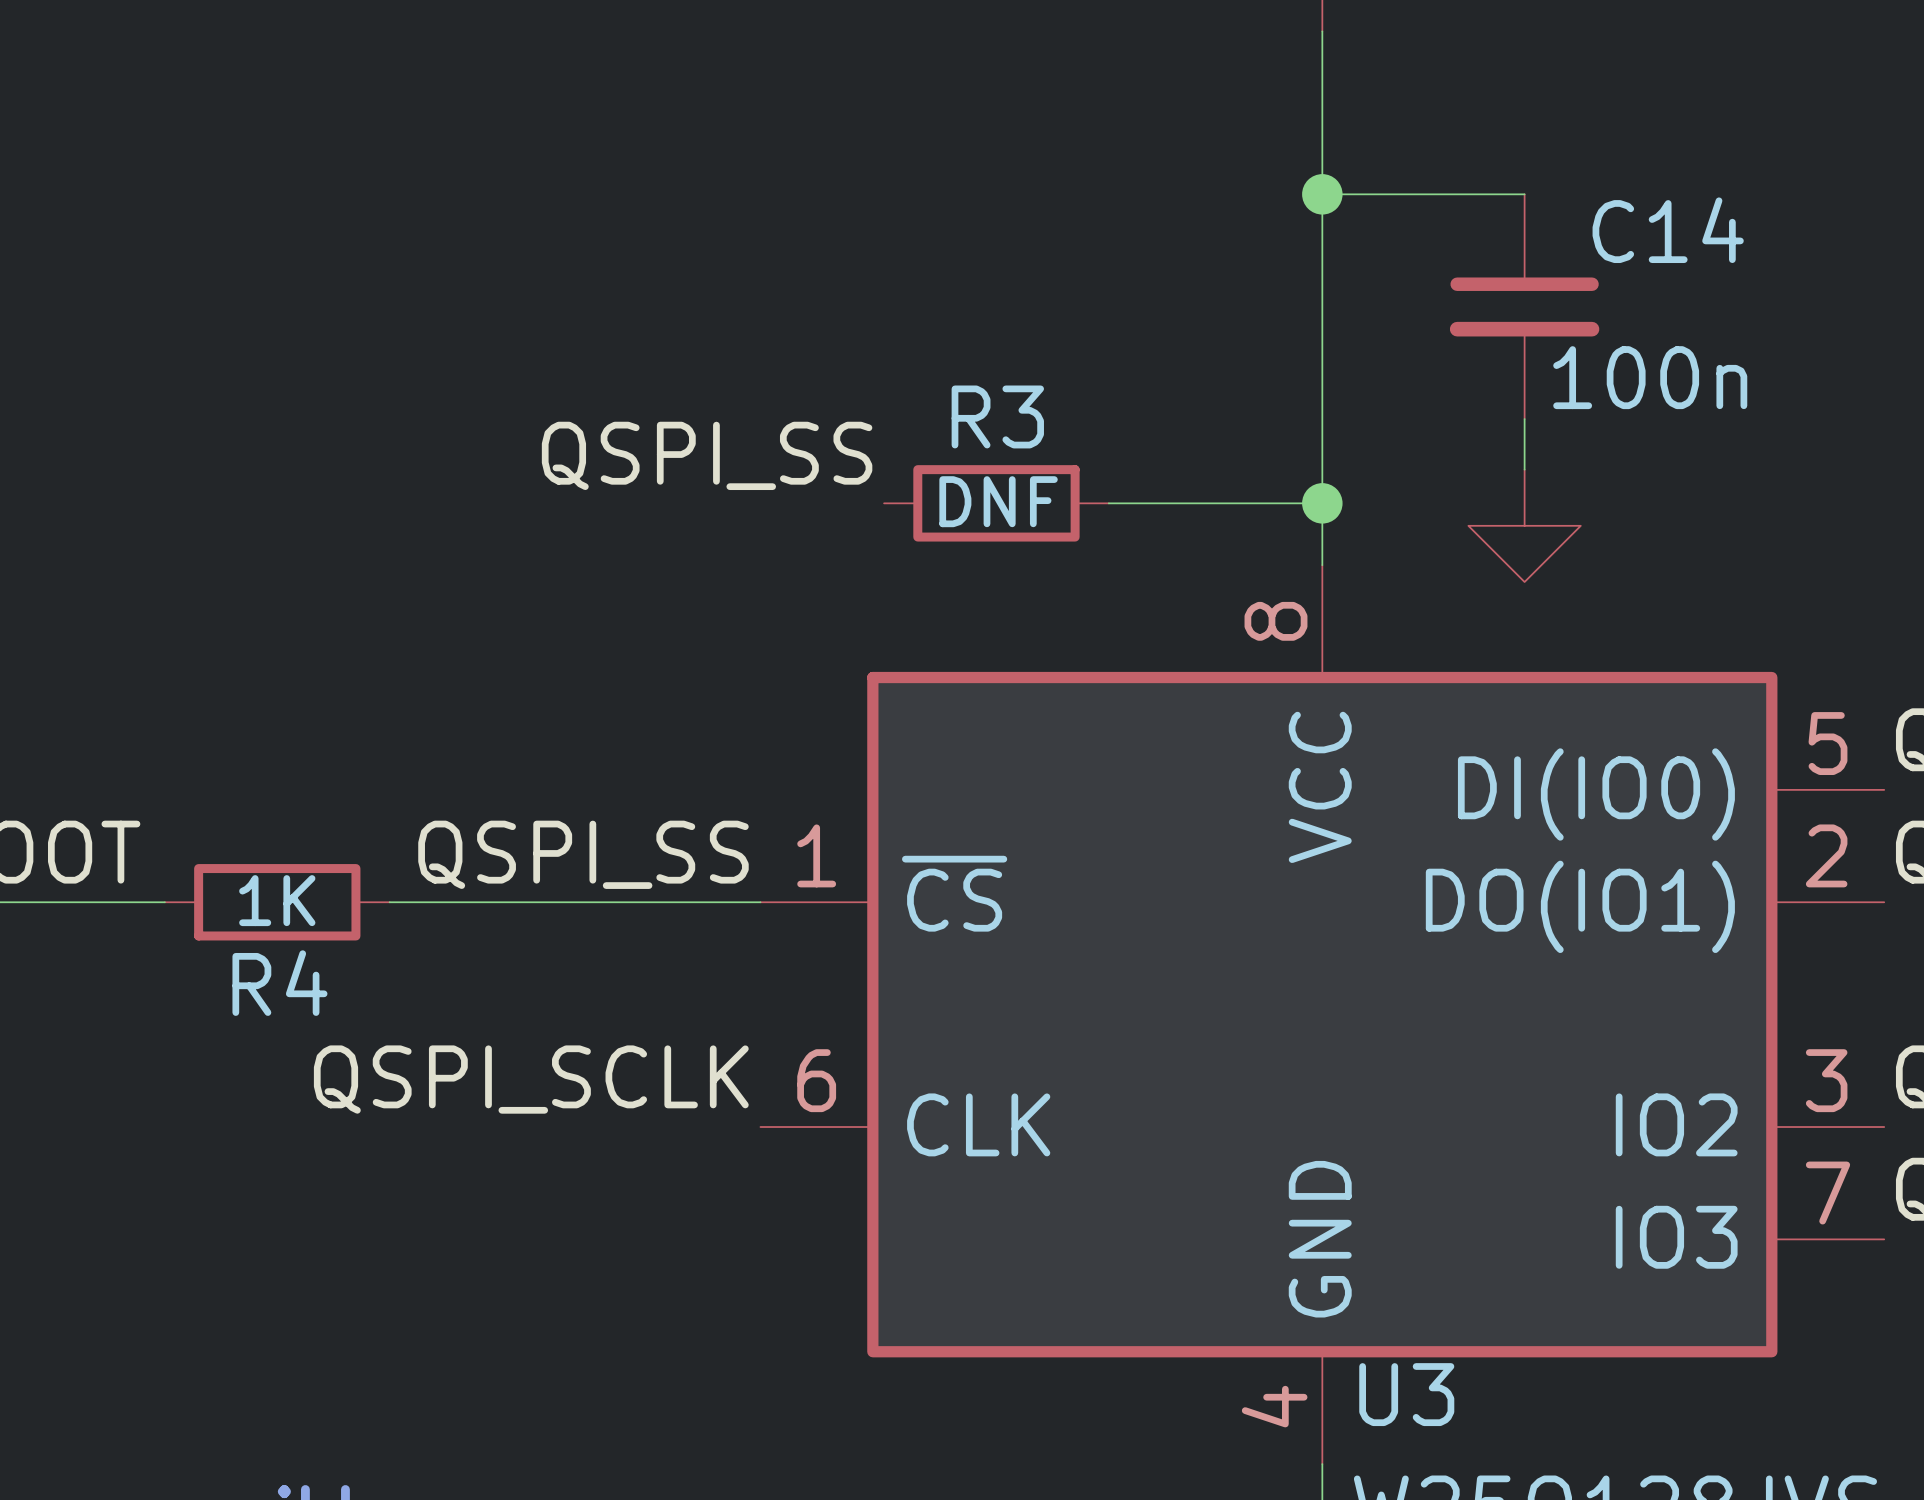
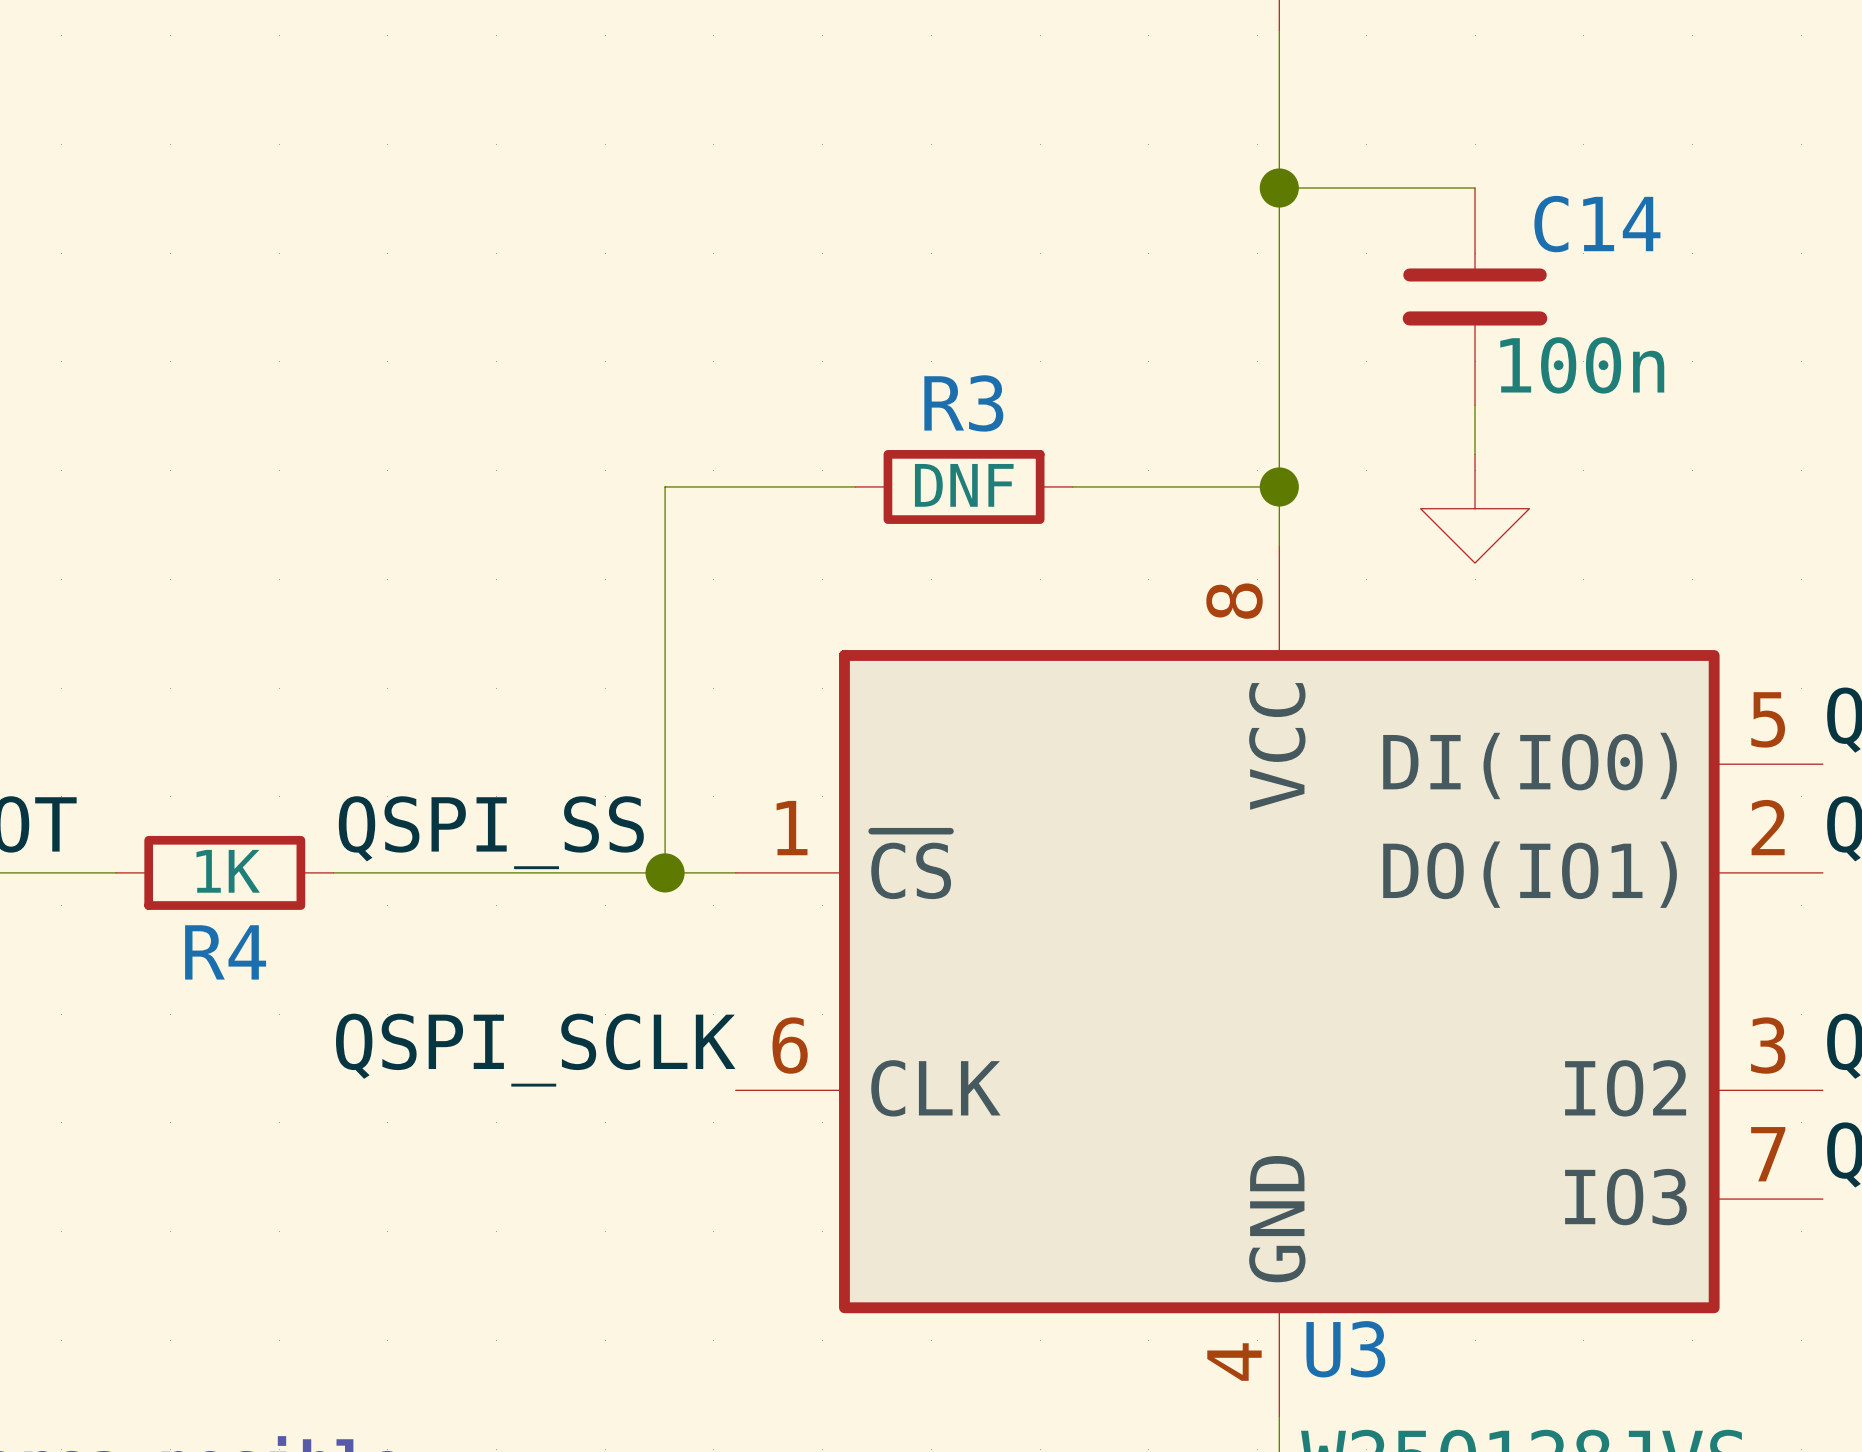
label: QSPI_SS (707, 455) -> none
wire: none -> (855, 486) (665, 486) (665, 872)
label position: QSPI_SS (583, 854) -> QSPI_SS (491, 832)
R4 position: (277, 902) -> (224, 872)
junction: none -> (665, 872)

